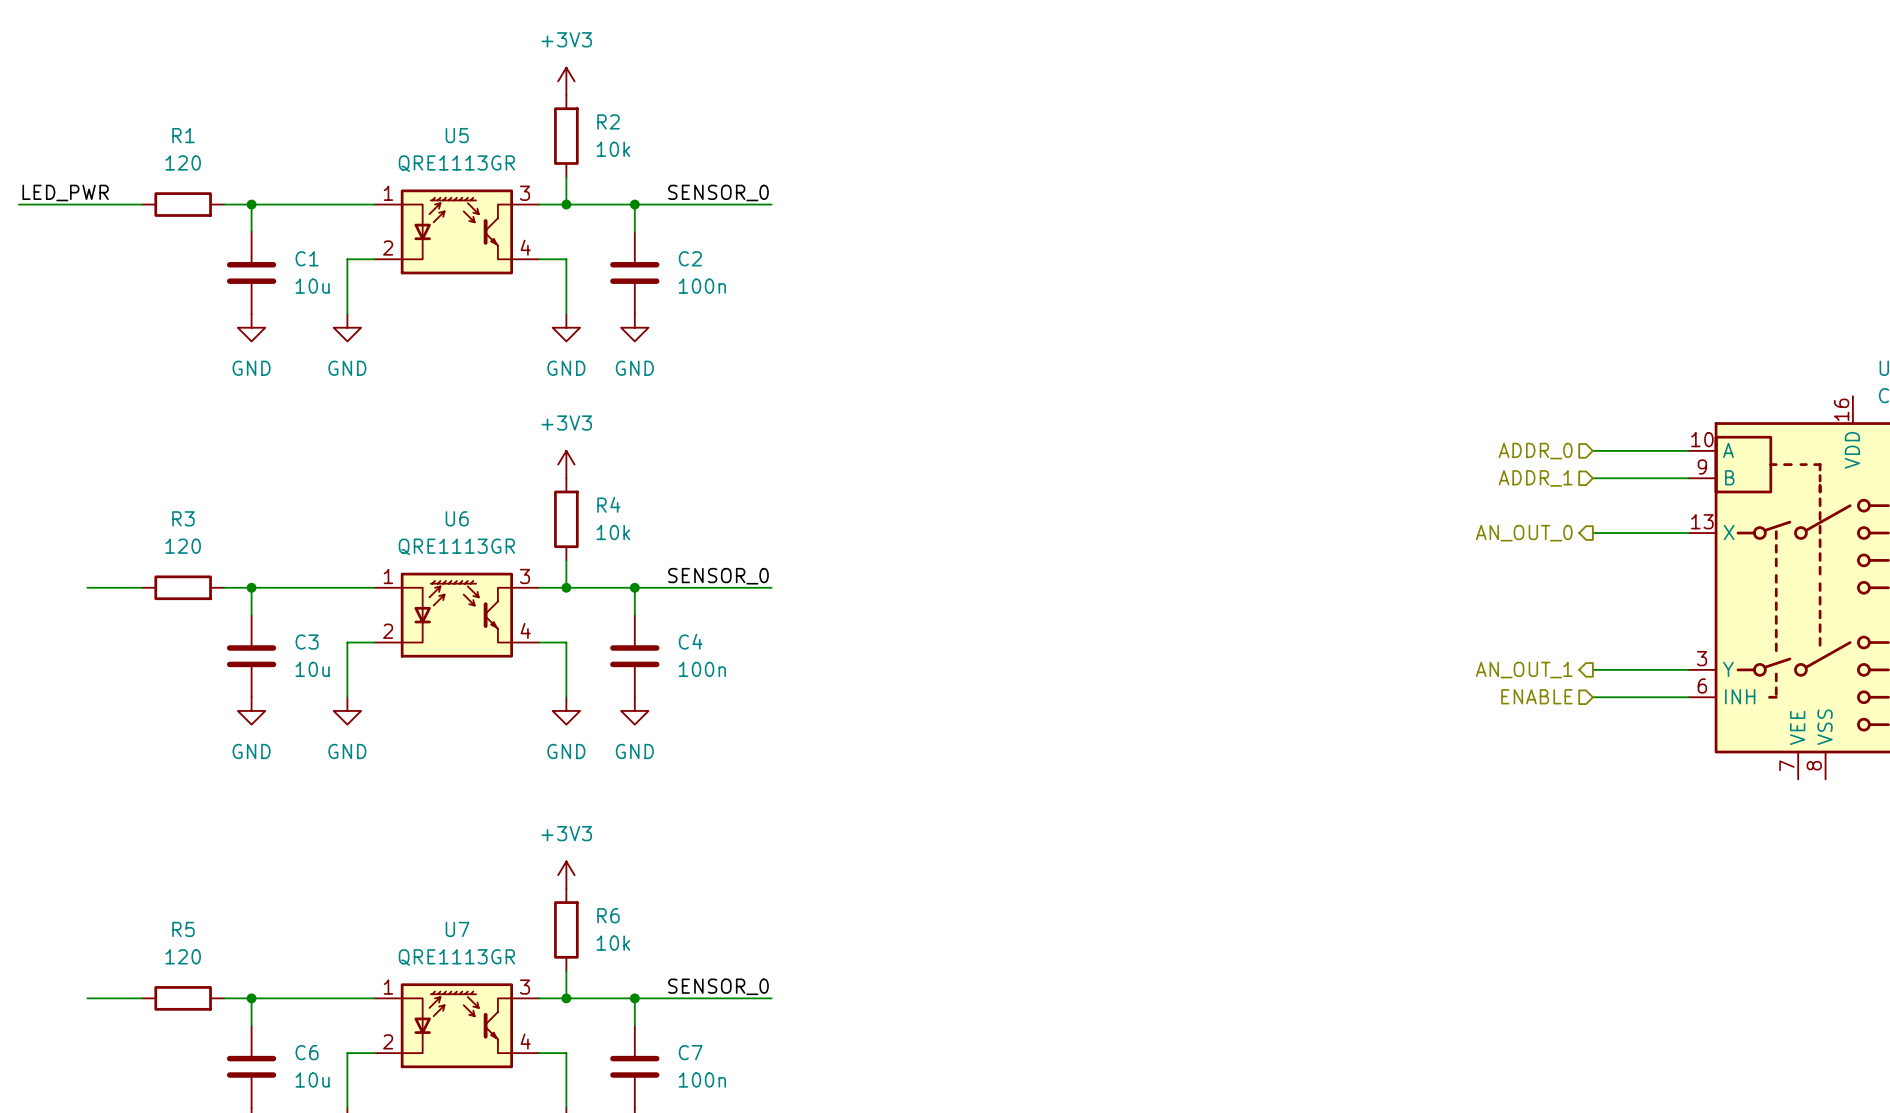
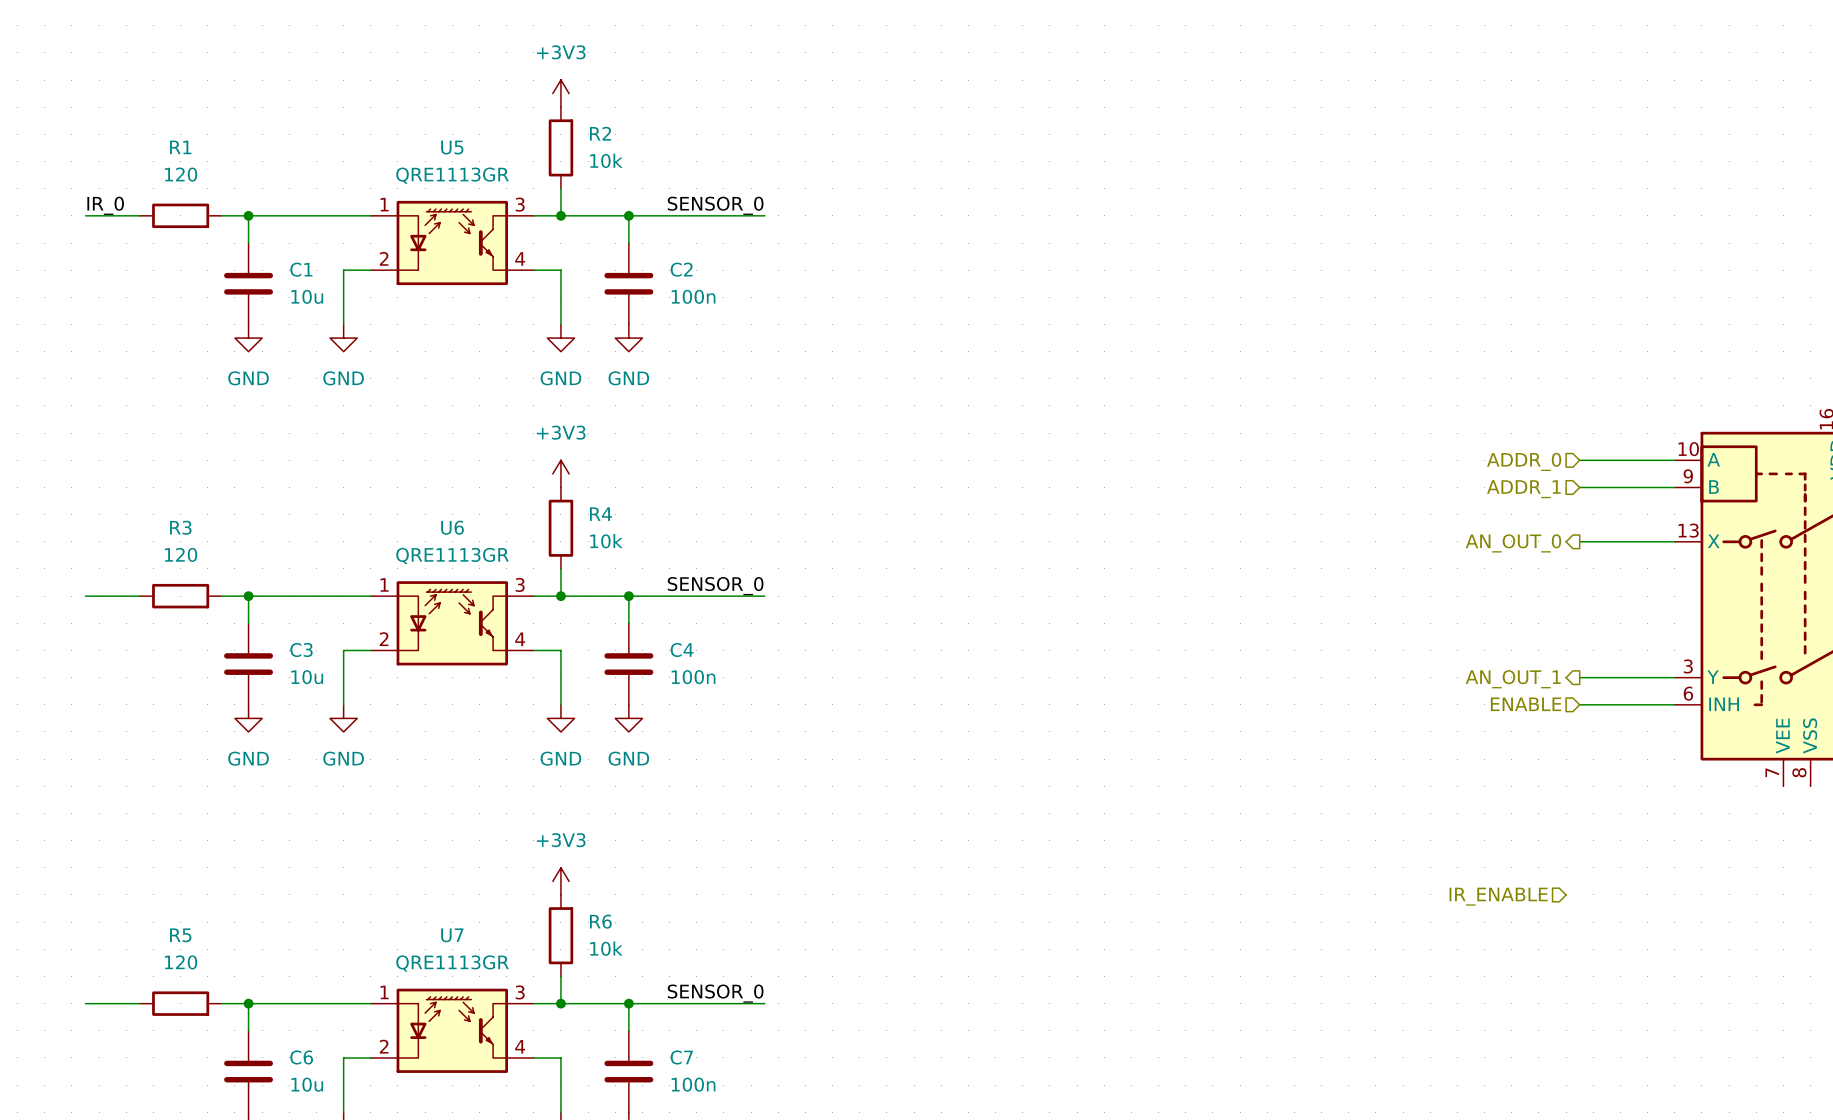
label: LED_PWR (65, 192) -> none
label: none -> IR_0 (105, 205)
wire: (18, 204) (87, 204) -> none
hierarchical label: none -> IR_ENABLE (1498, 896)

